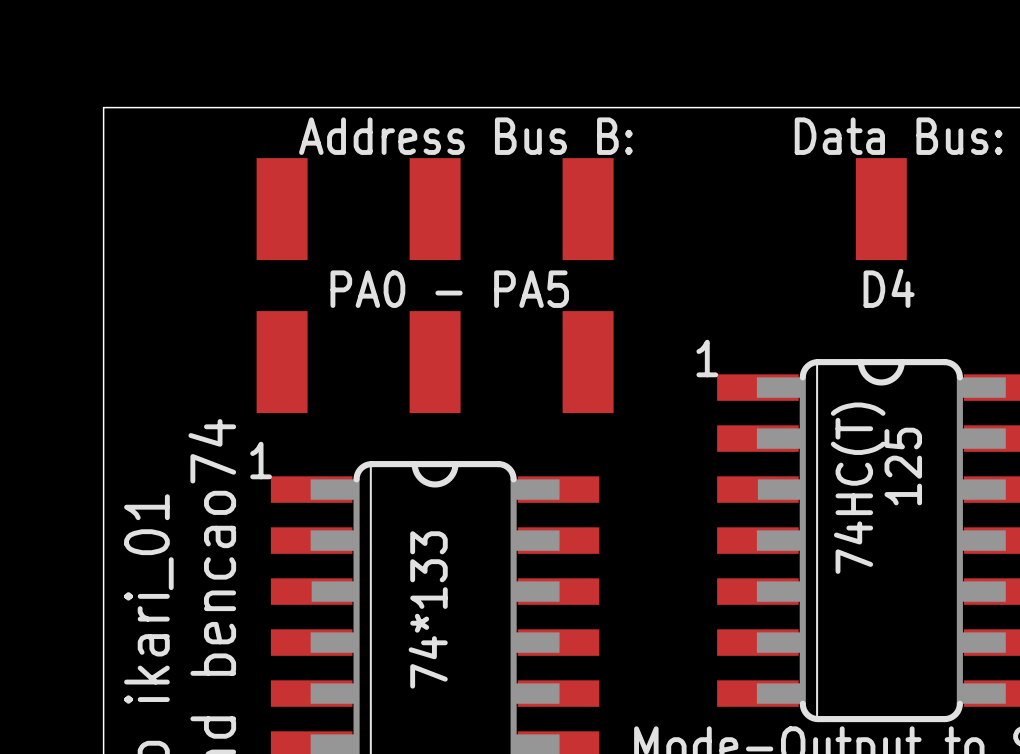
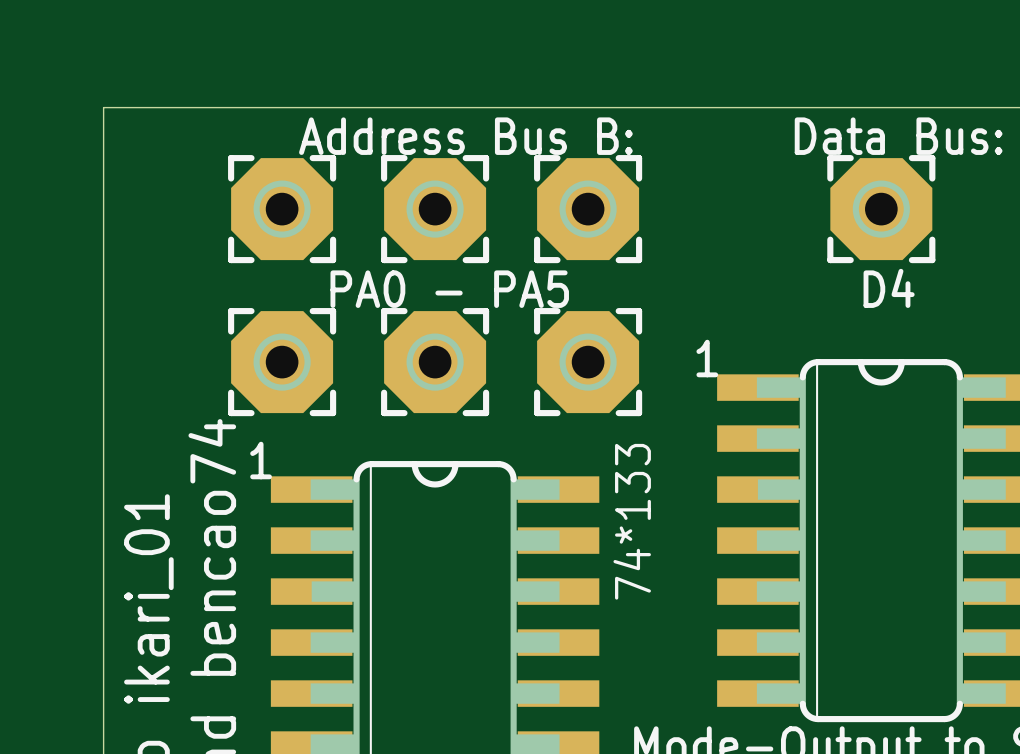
part footprint: [256, 158, 308, 261] -> [228, 155, 337, 264]
part footprint: [409, 158, 461, 261] -> [381, 155, 490, 264]
part footprint: [562, 158, 614, 261] -> [534, 155, 643, 264]
part footprint: [855, 158, 907, 261] -> [827, 155, 936, 264]
part footprint: [256, 311, 308, 414] -> [228, 308, 337, 417]
part footprint: [409, 311, 461, 414] -> [381, 308, 490, 417]
part footprint: [562, 311, 614, 414] -> [534, 308, 643, 417]
text: 125 (903, 466) -> none
text: 74HC(T) (858, 488) -> none
74*133 name position: 74*133 (428, 609) -> 74*133 (632, 521)

